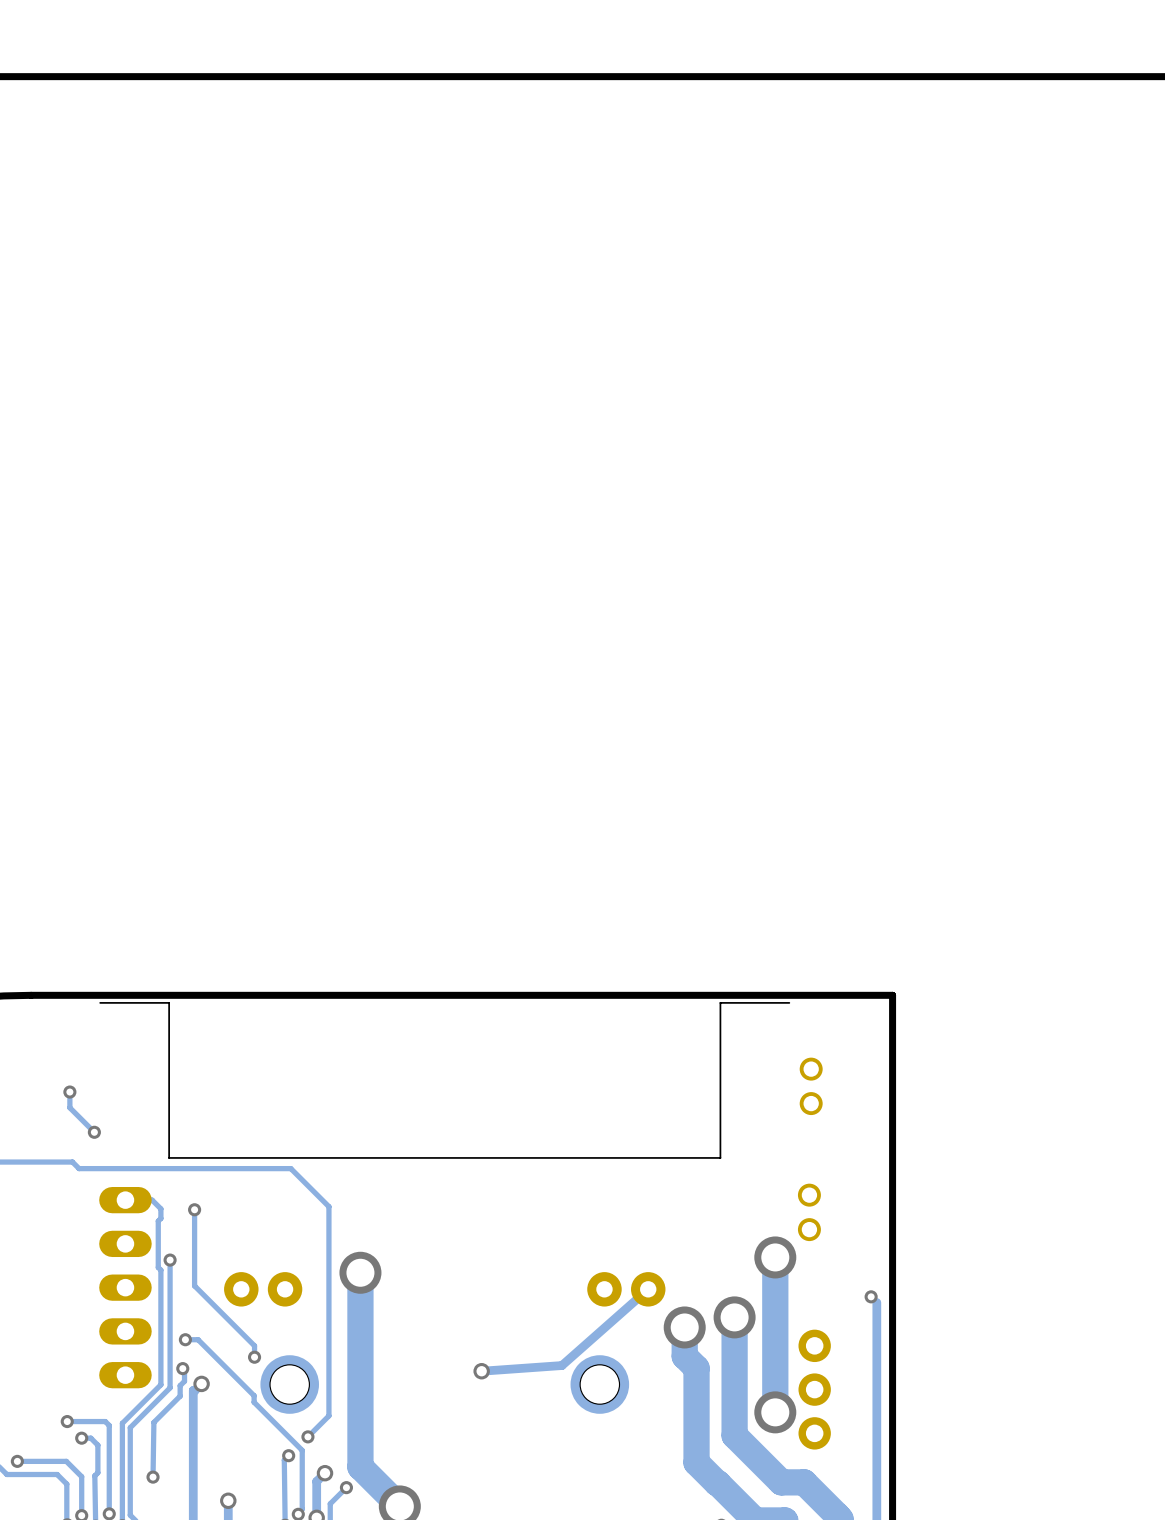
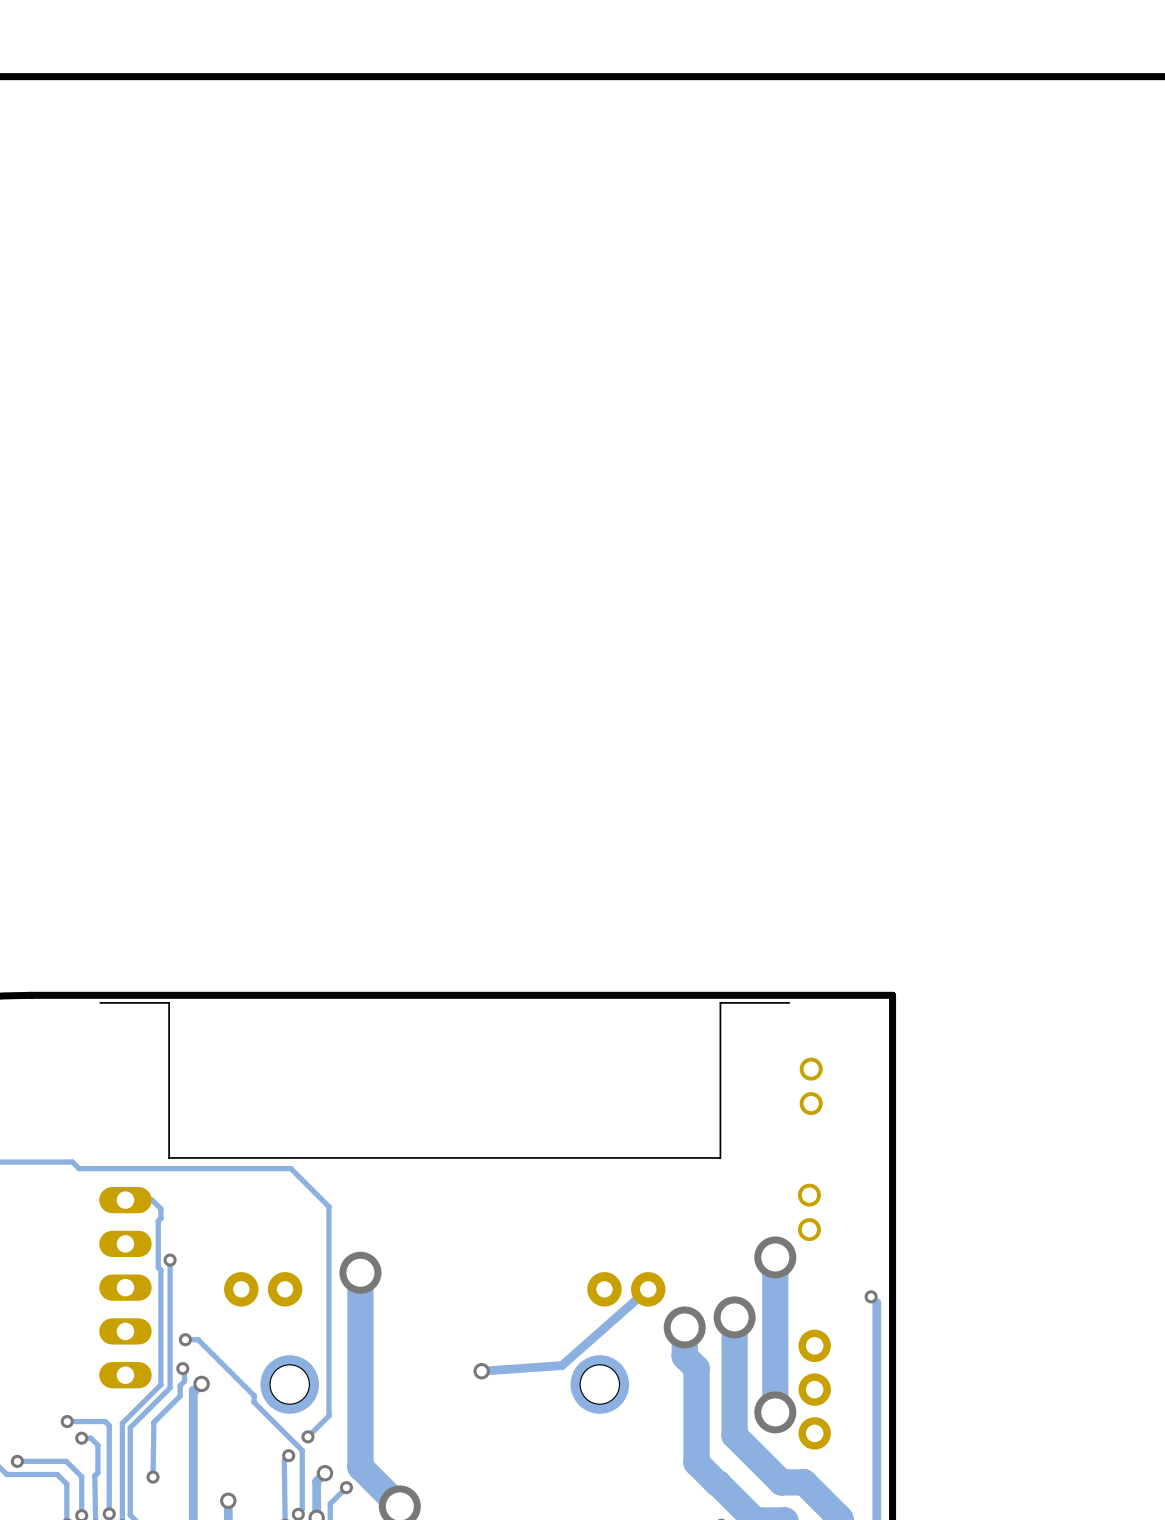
track: (69, 1092) (69, 1107) (94, 1132) -> none
via: (69, 1092) -> none
via: (94, 1132) -> none
track: (194, 1209) (194, 1285) (254, 1345) (254, 1357) -> none
via: (194, 1209) -> none
via: (254, 1357) -> none

